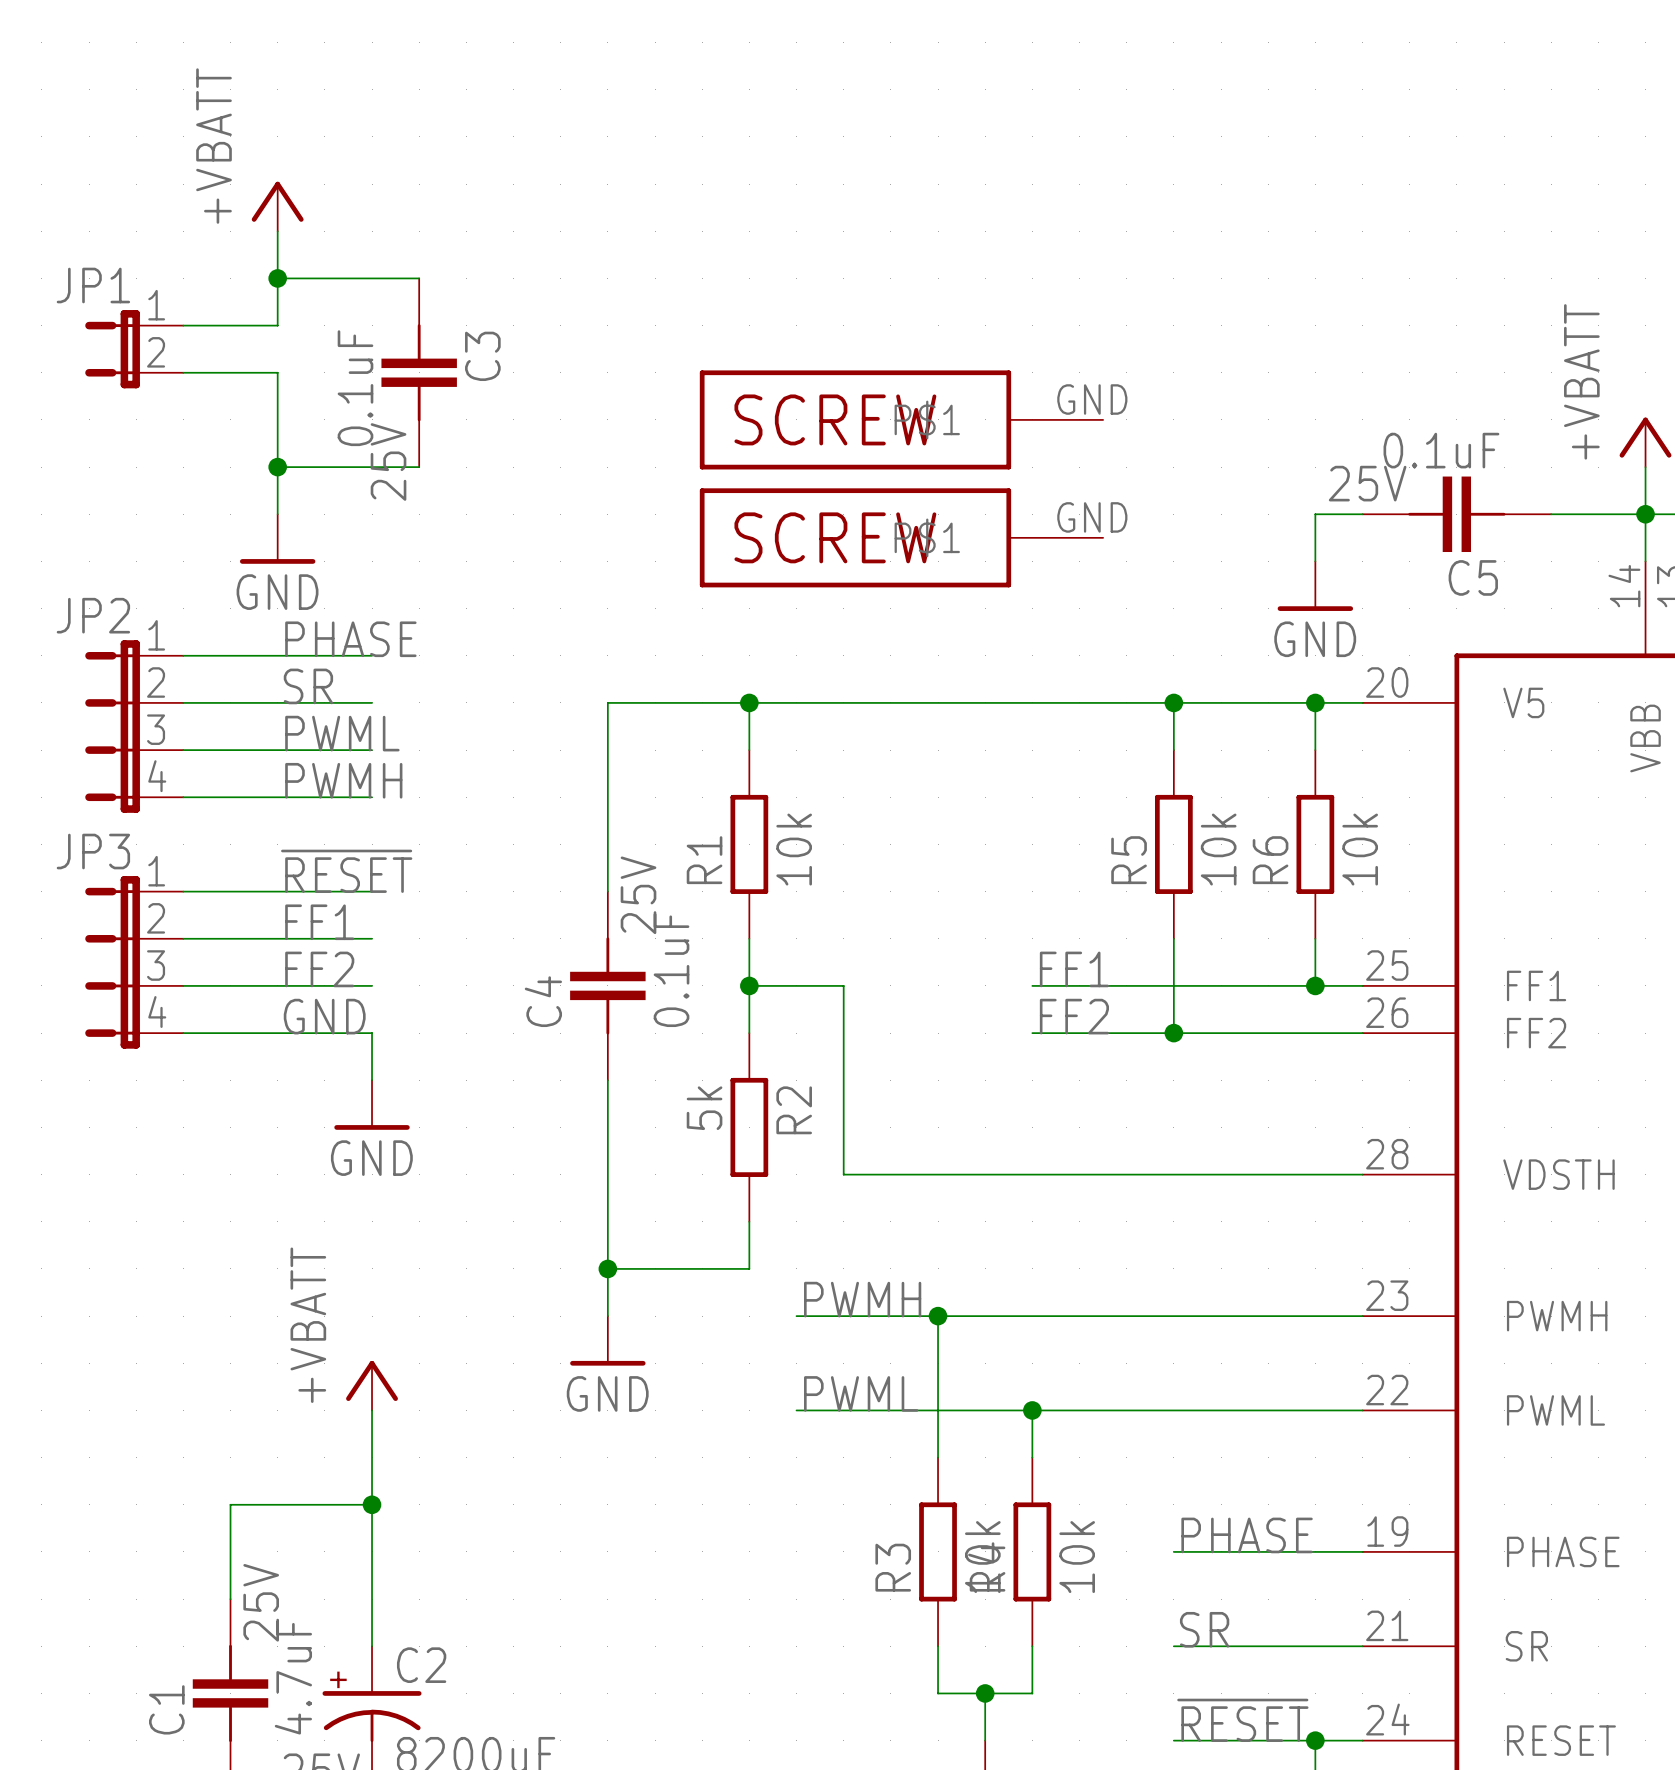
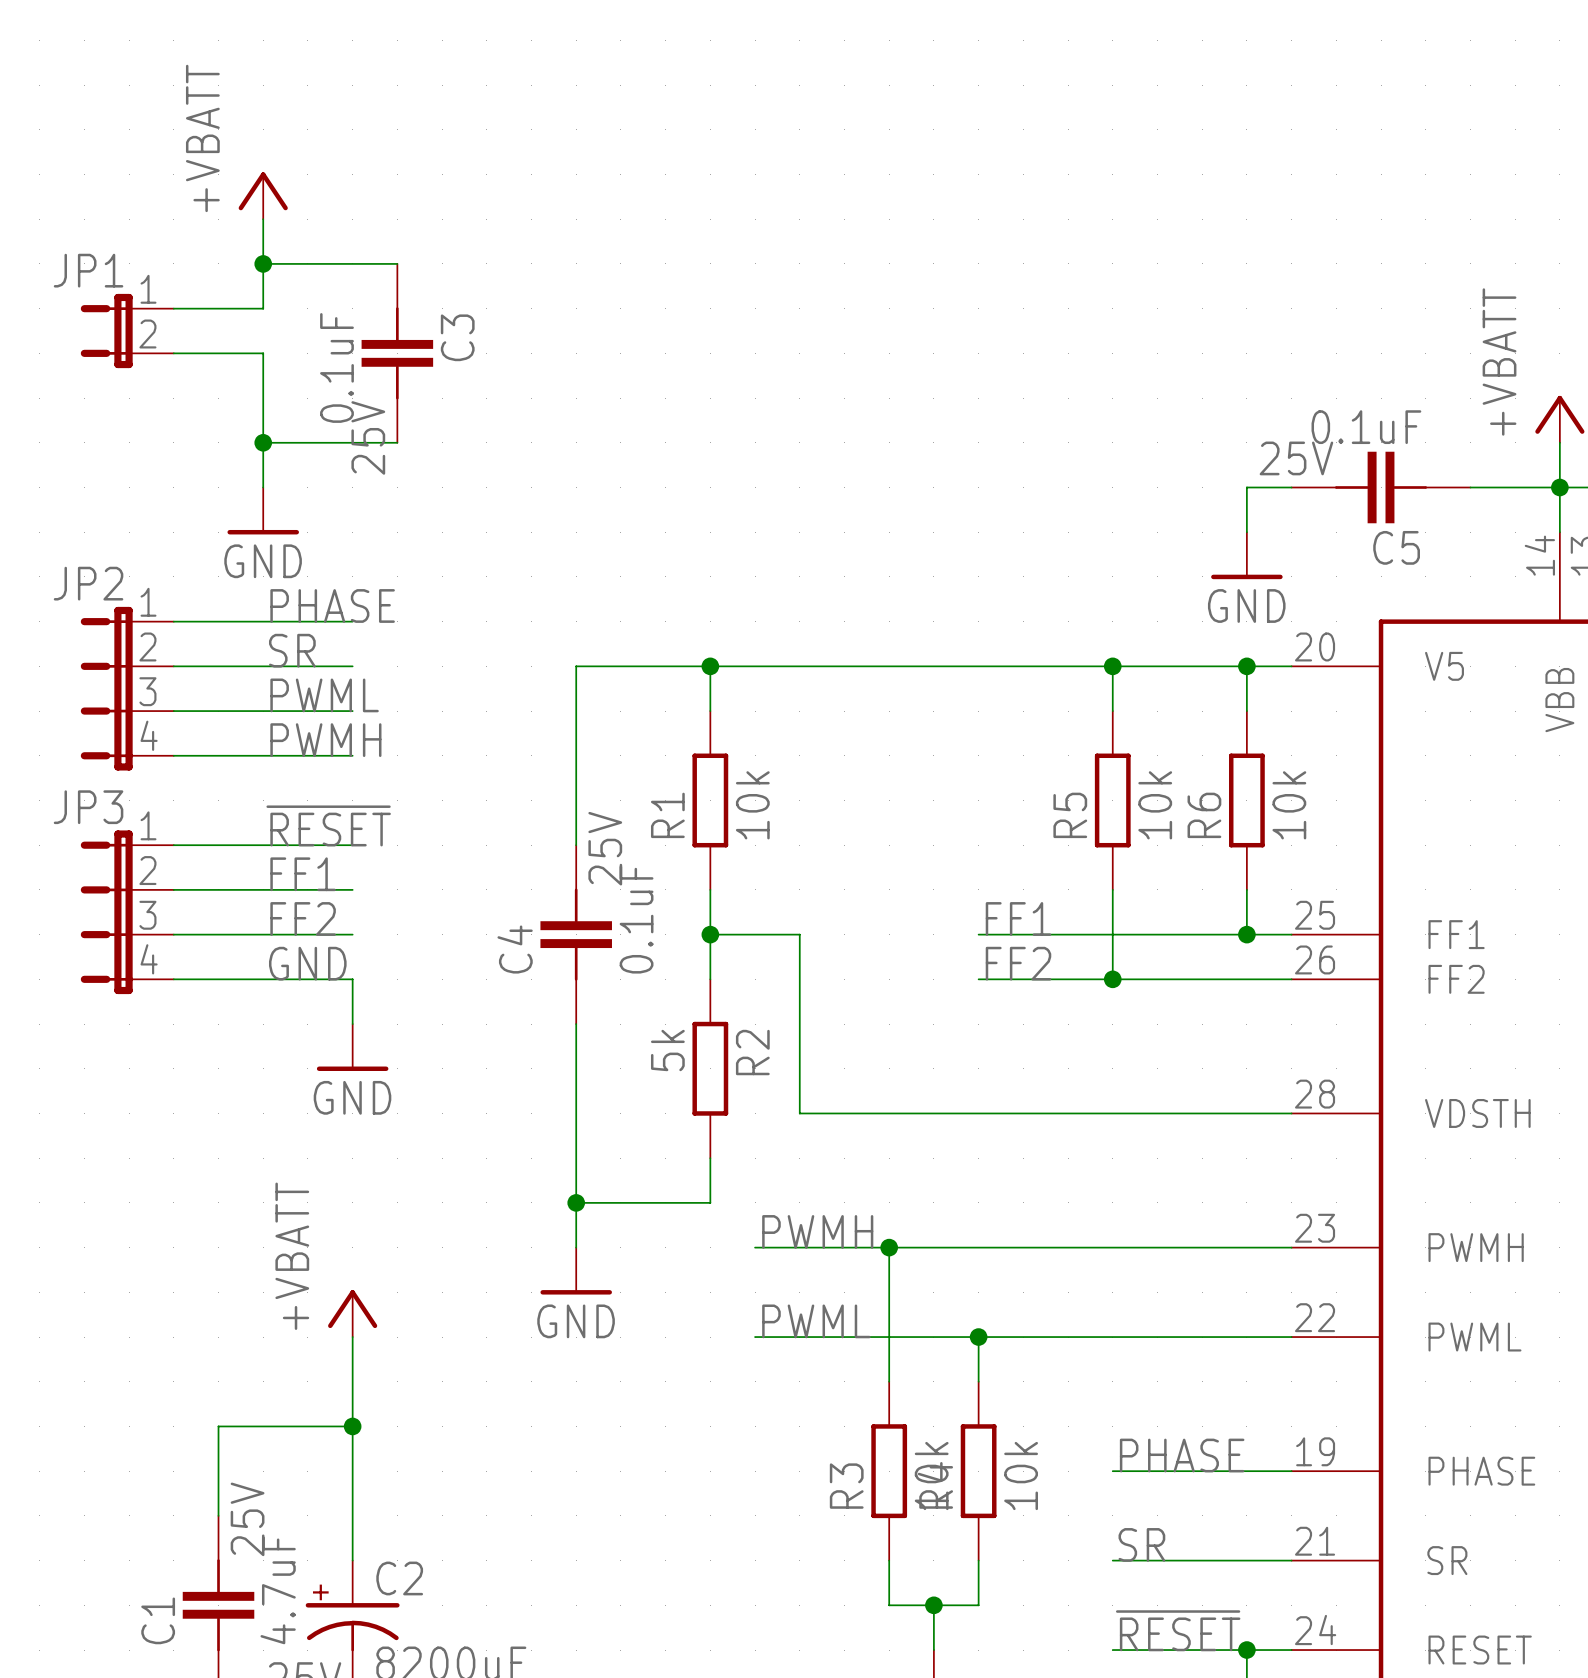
part: (901, 419) -> none
part: (901, 537) -> none

